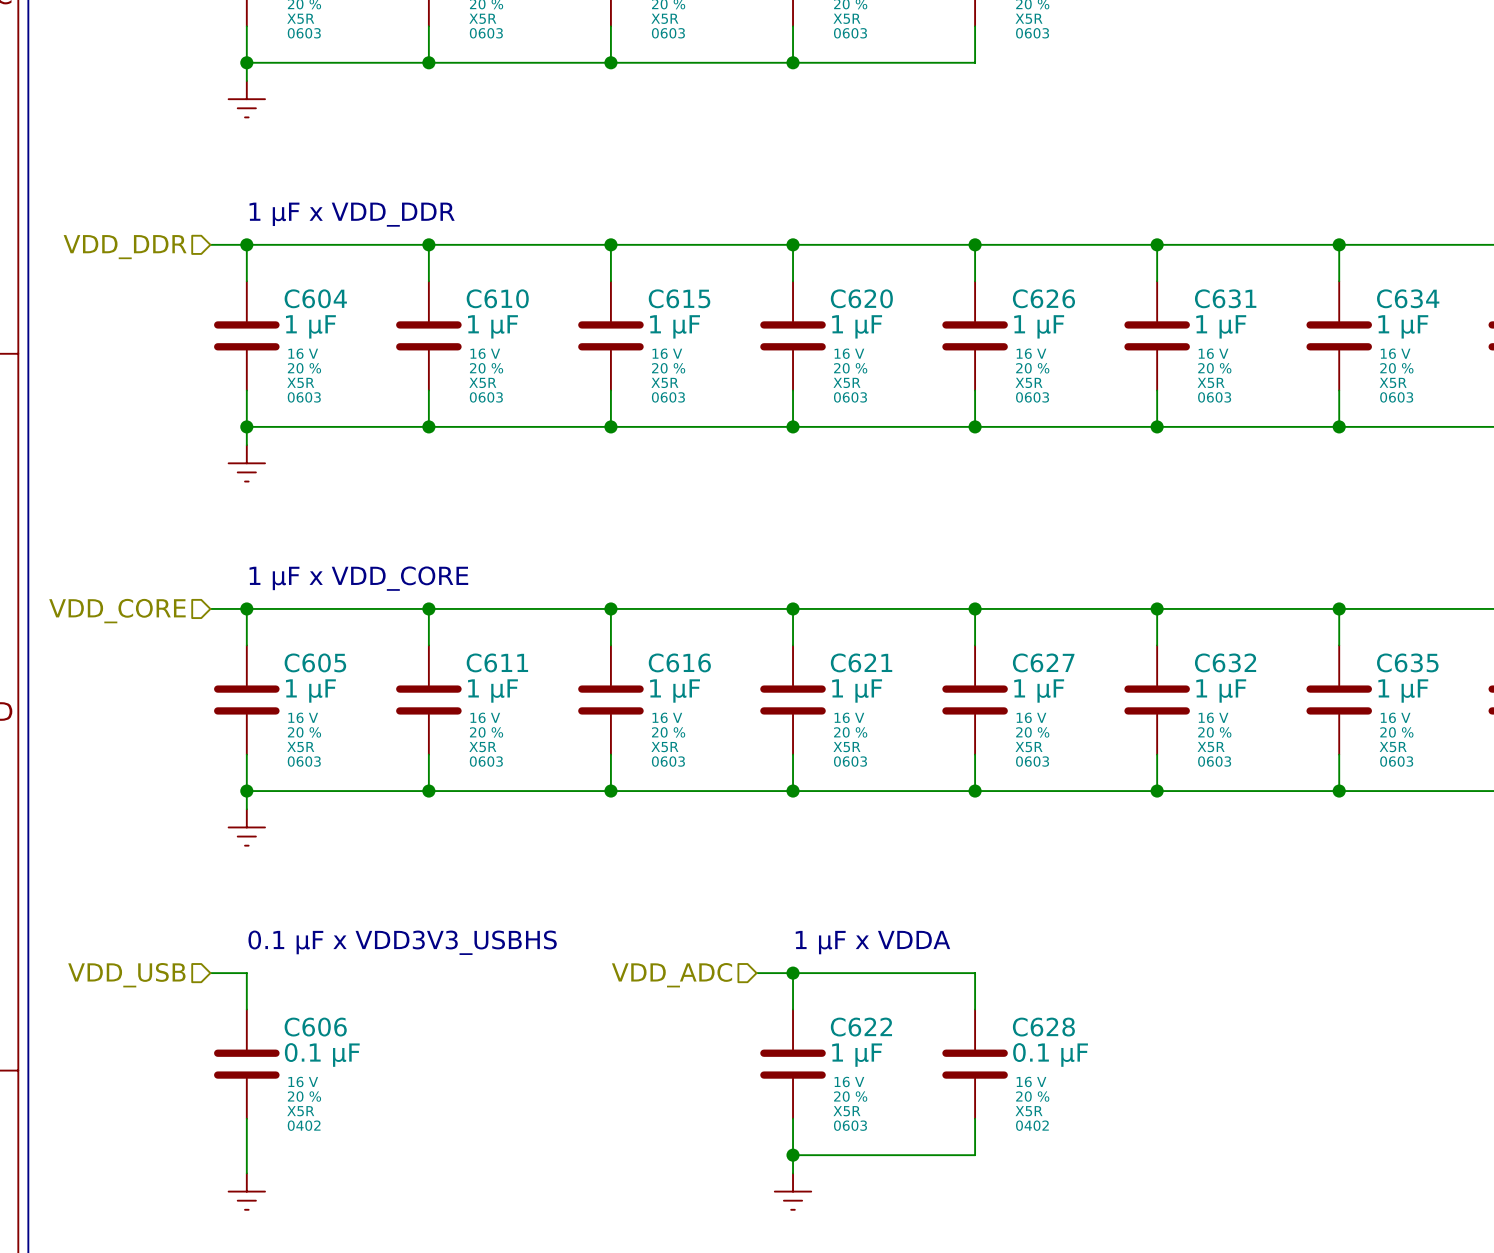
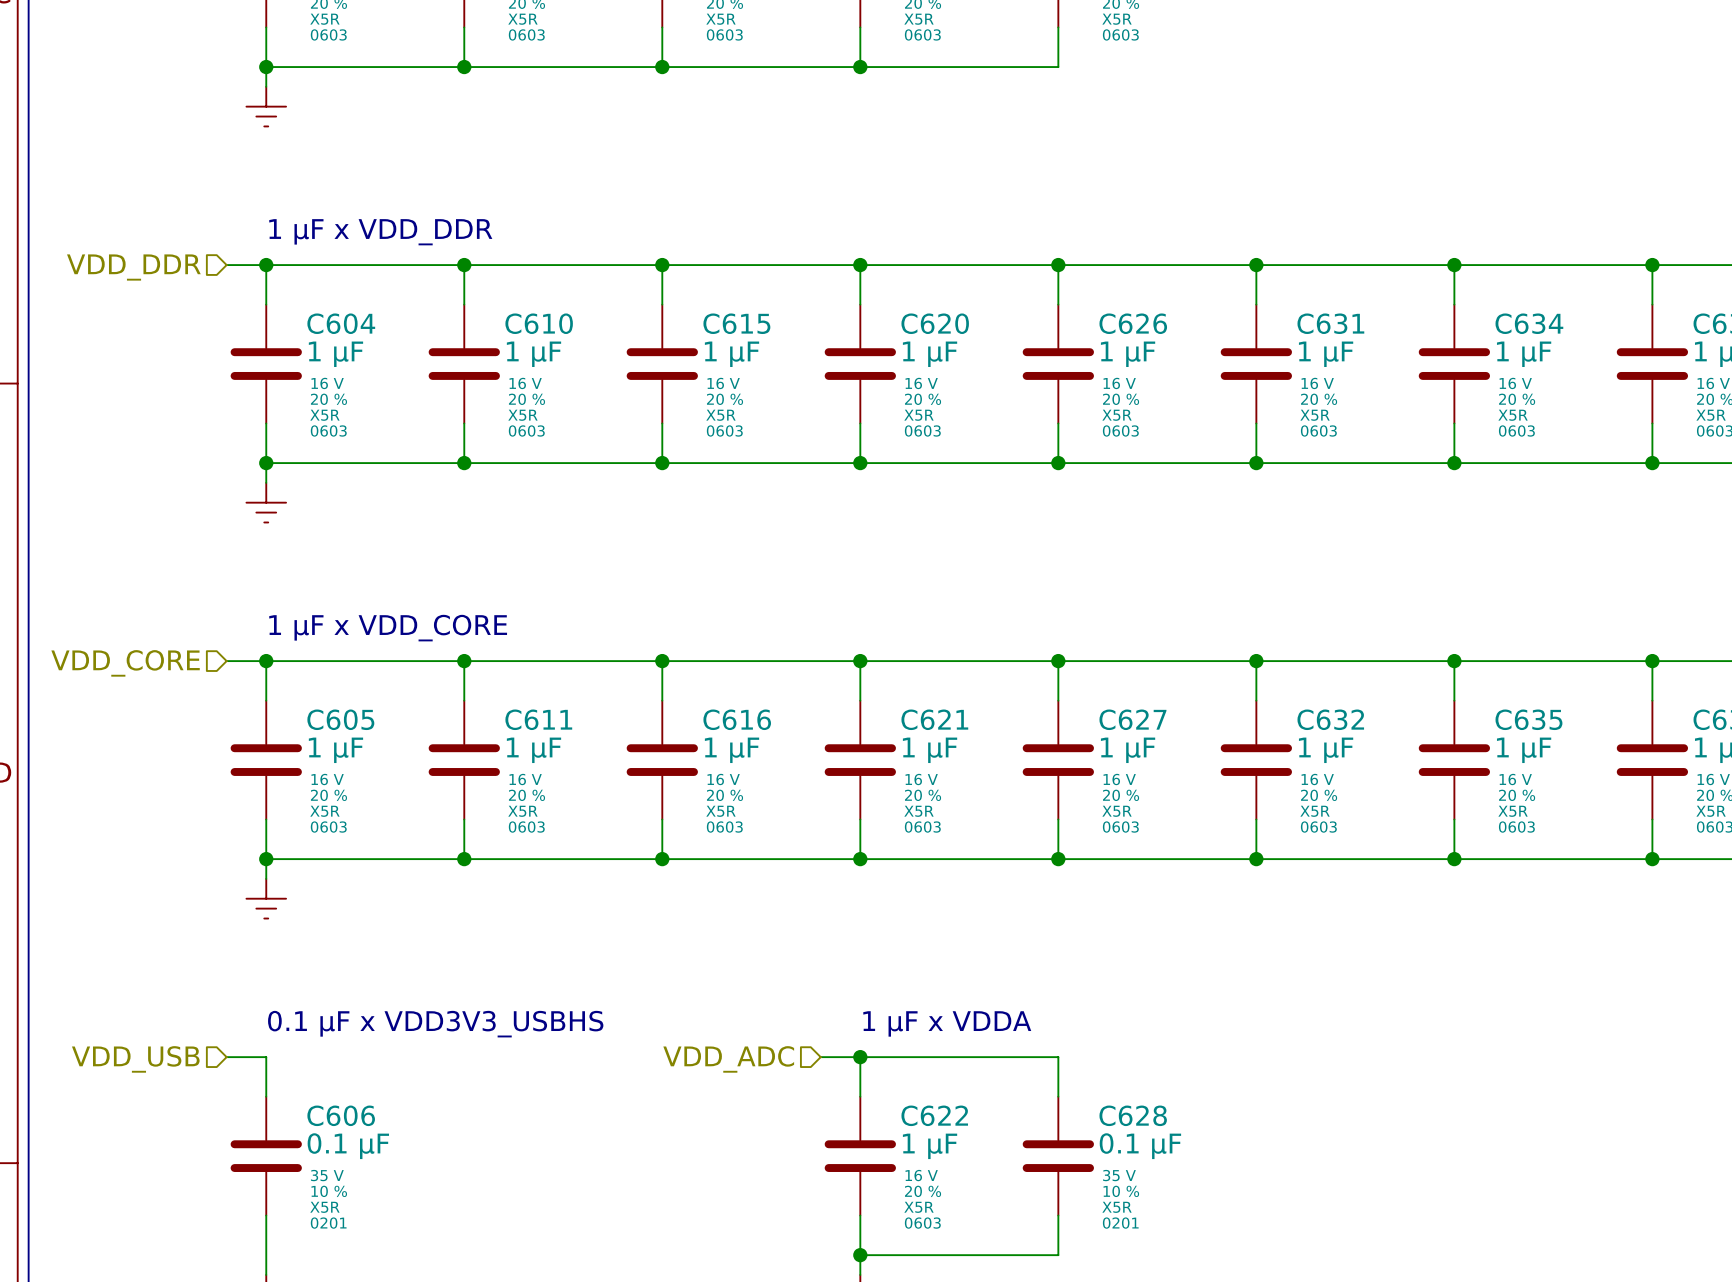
C606 text: 16 V (303, 1081) -> 35 V (327, 1175)
C628 text: 16 V (1031, 1081) -> 35 V (1119, 1175)
C606 text: 20 % (304, 1096) -> 10 % (329, 1191)
C628 text: 20 % (1032, 1096) -> 10 % (1121, 1191)
C606 text: 0402 (304, 1125) -> 0201 (328, 1223)
C628 text: 0402 (1032, 1125) -> 0201 (1120, 1223)

